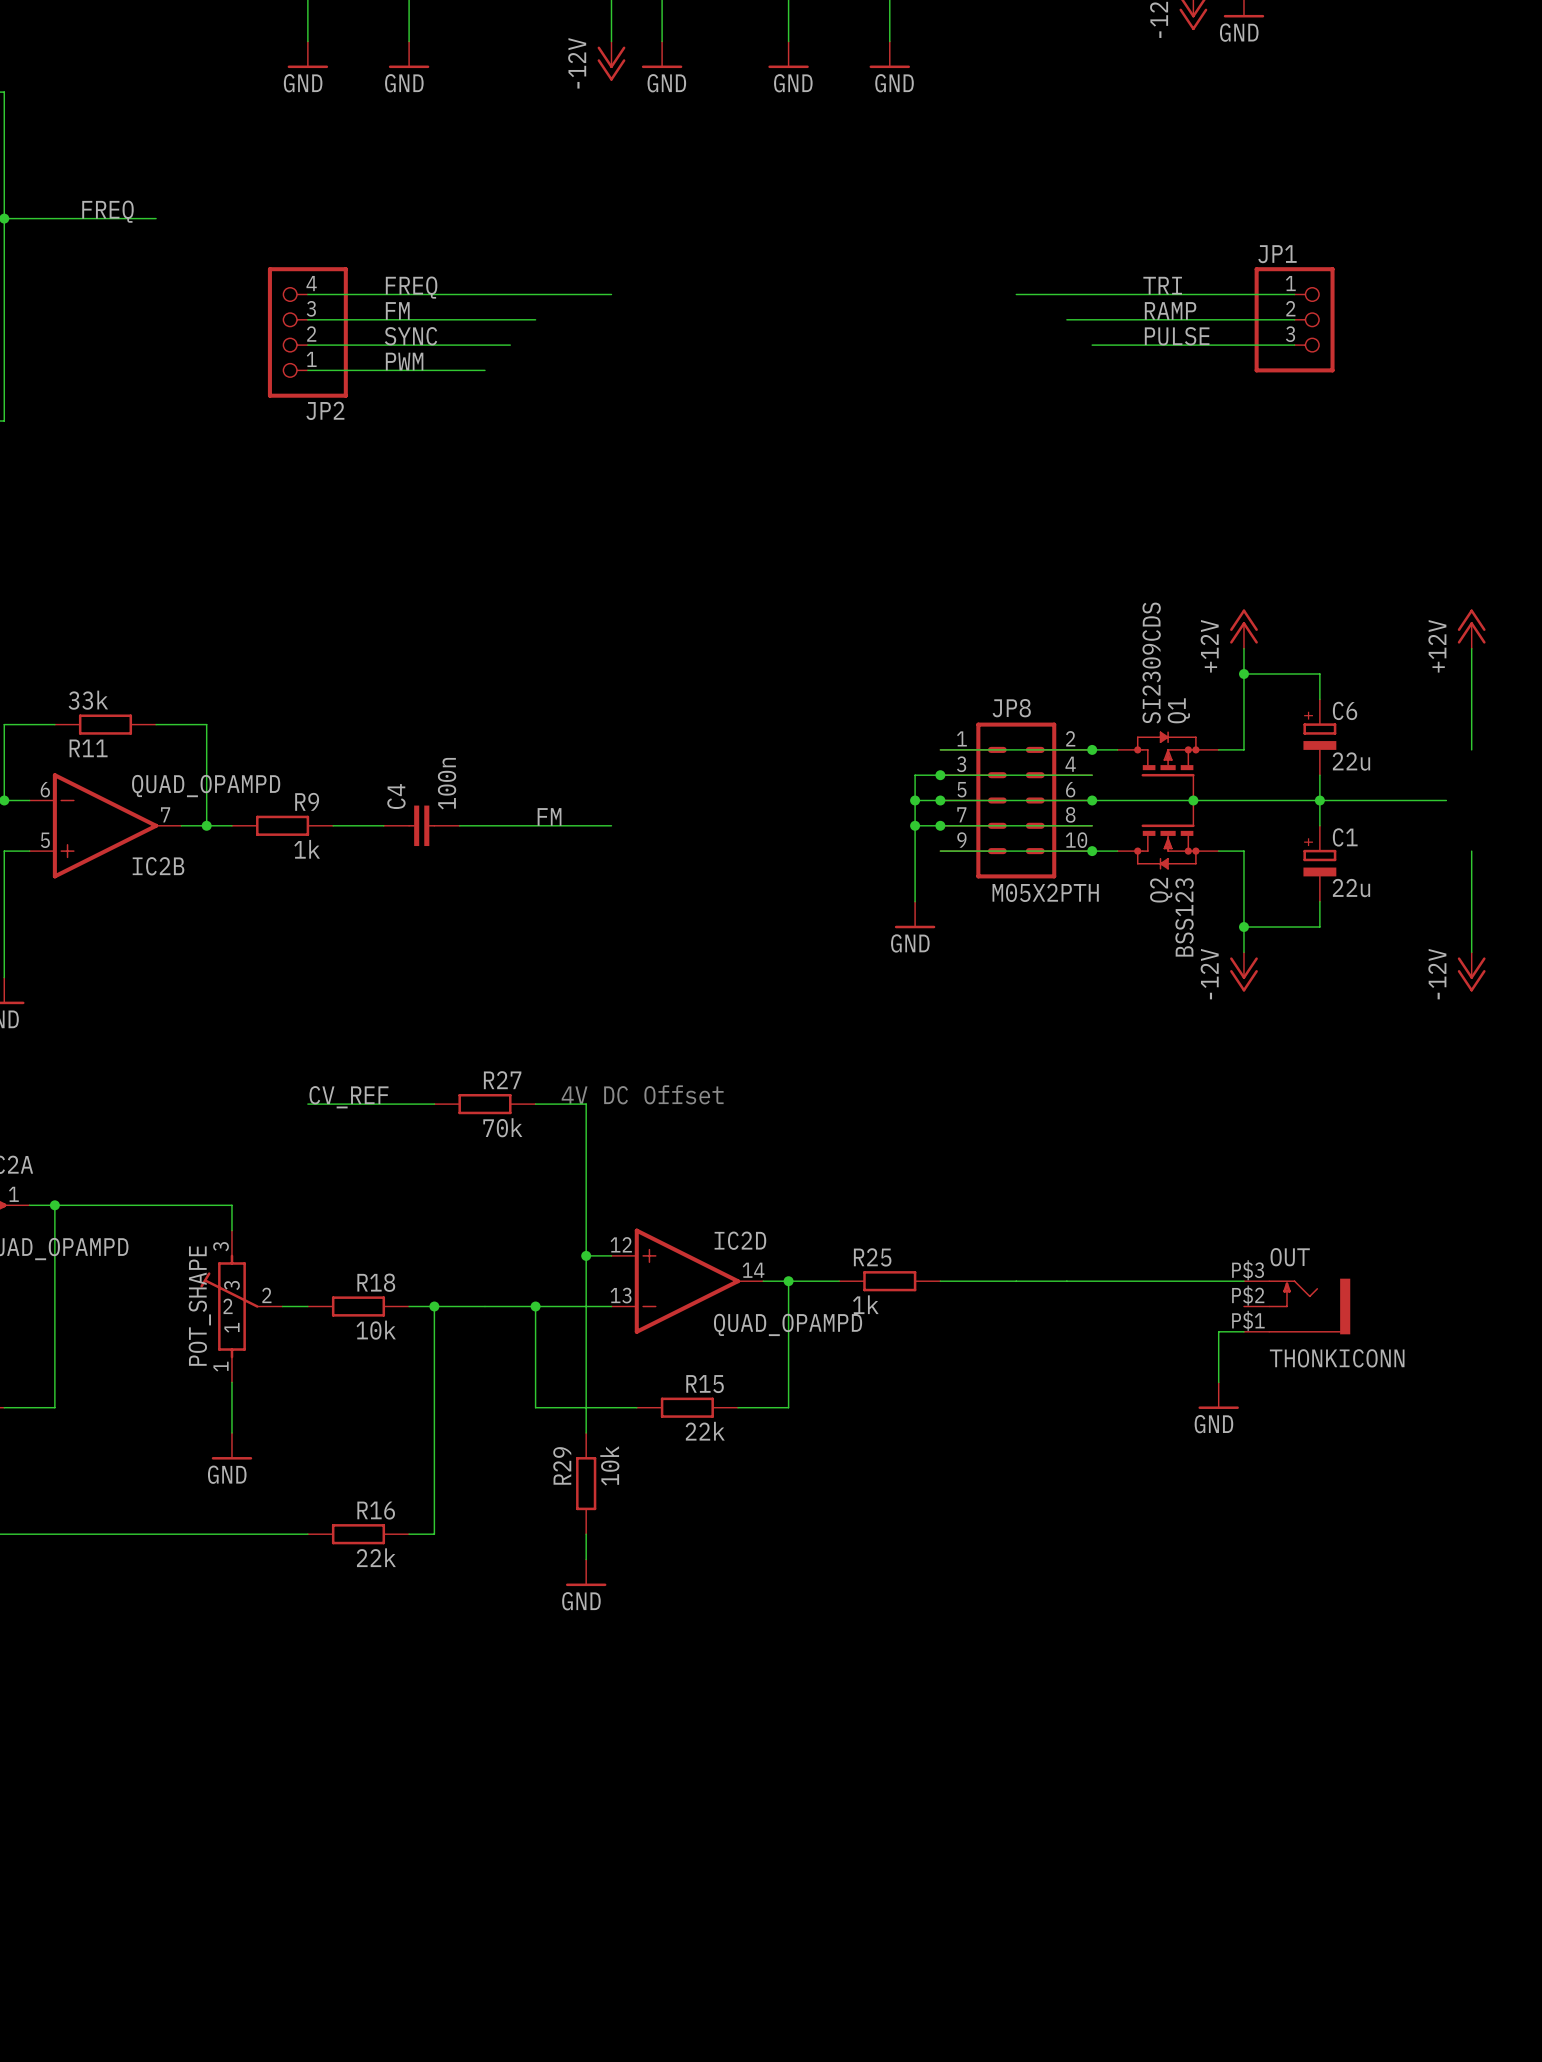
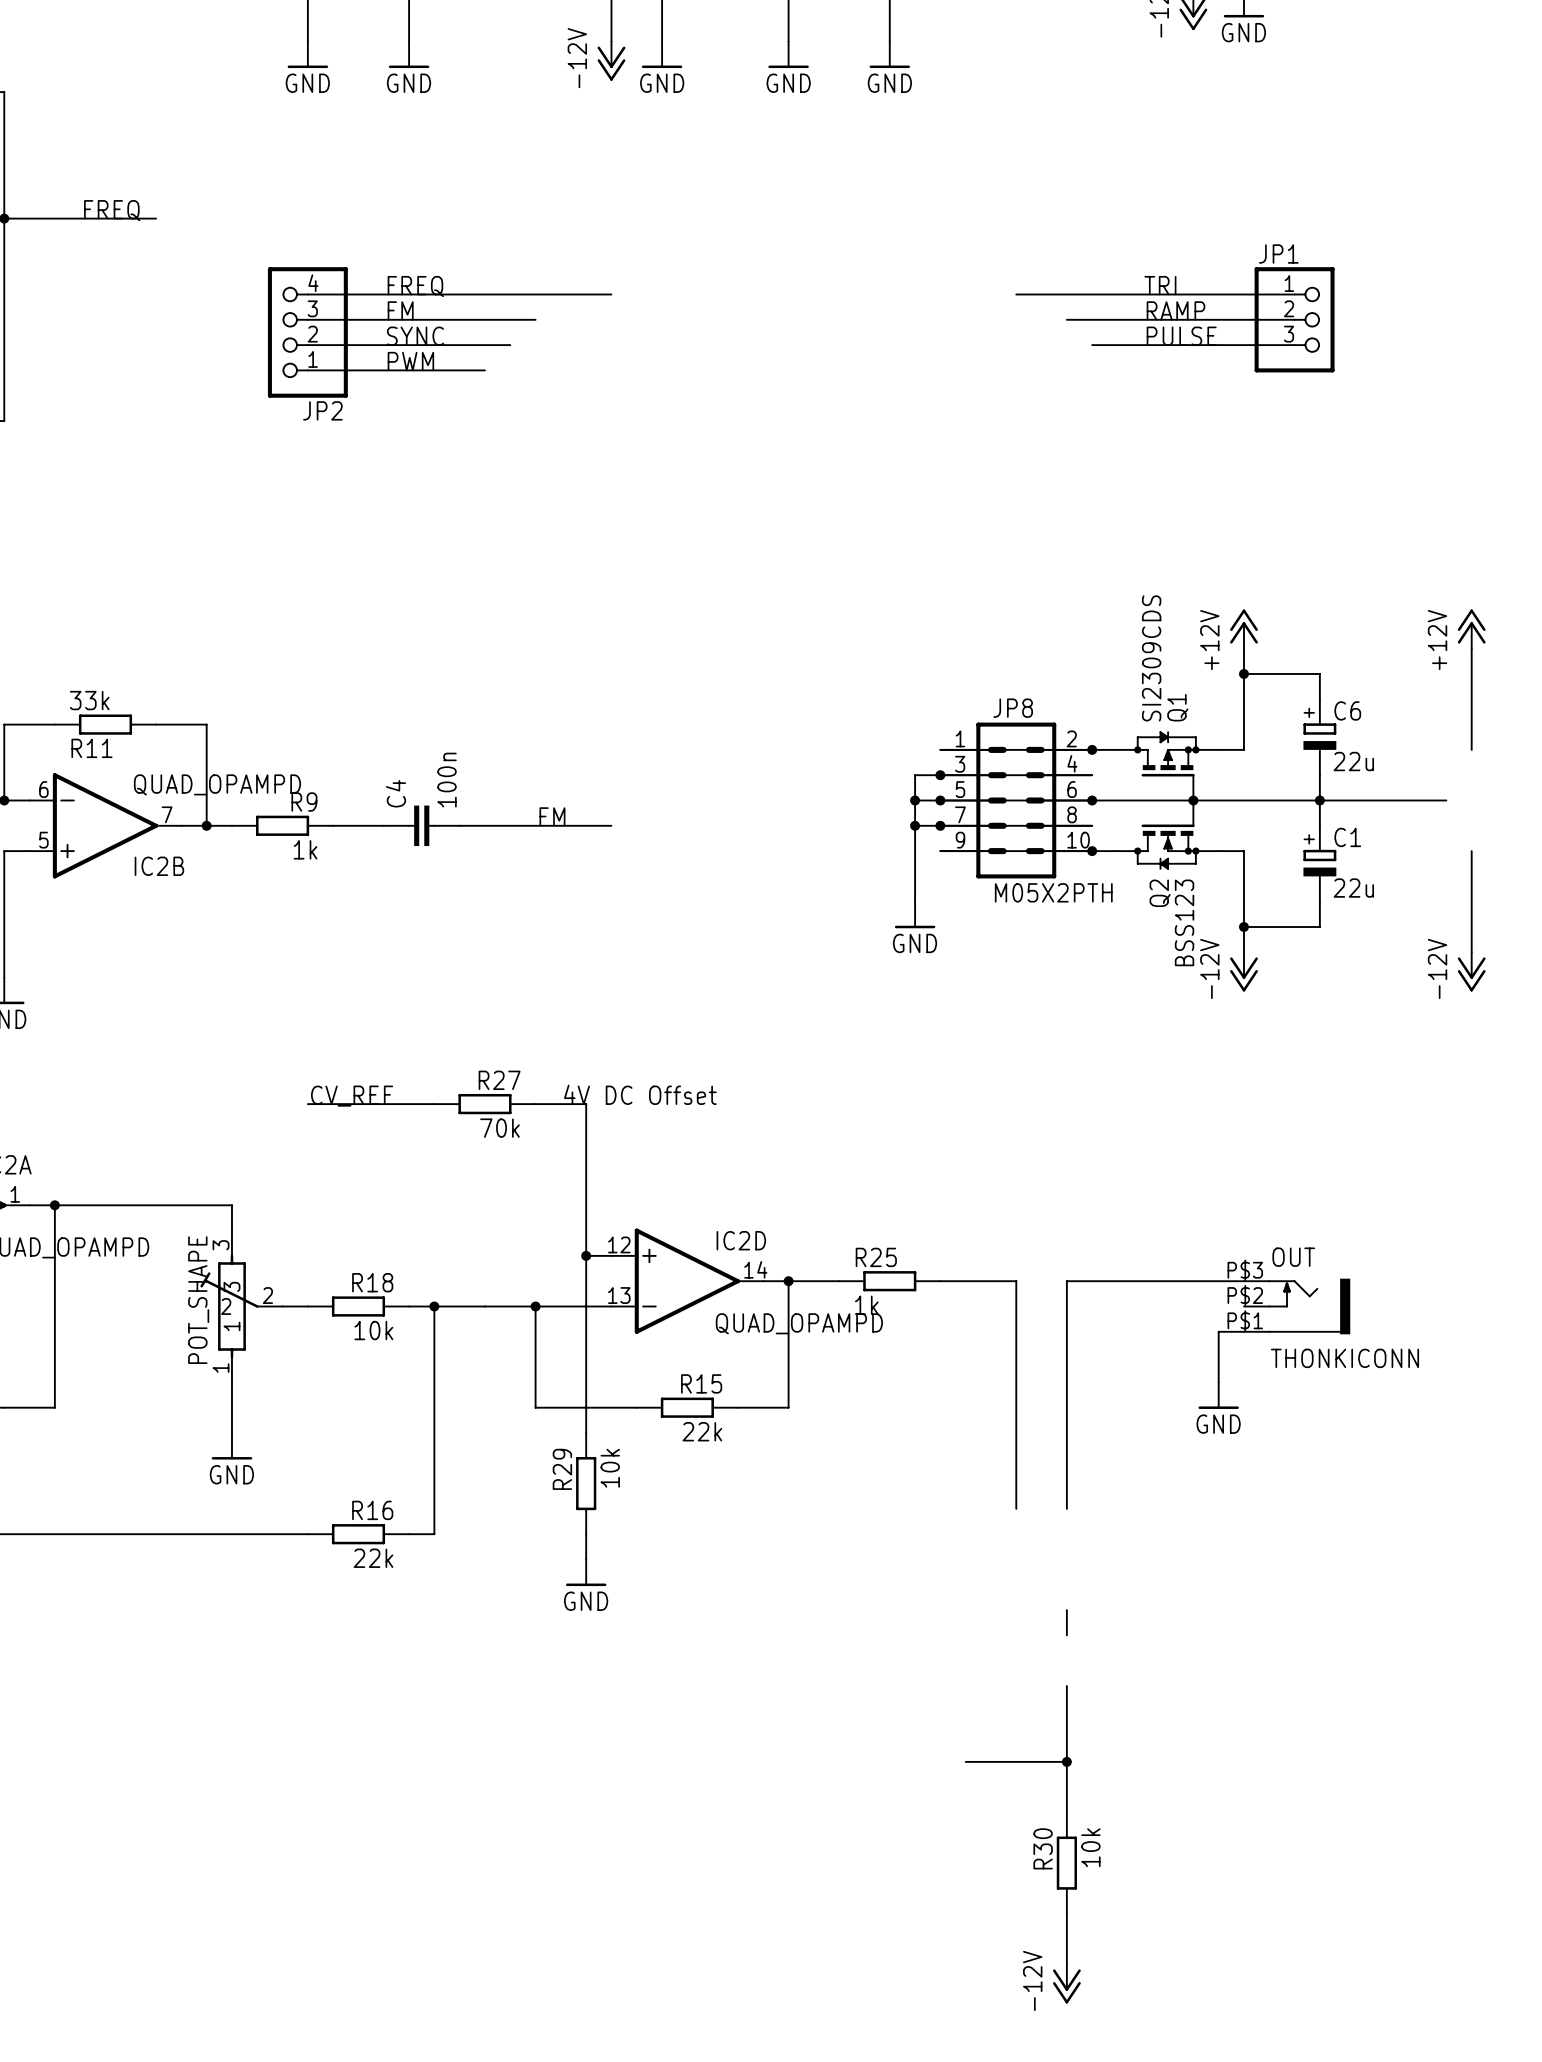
wire: (1016, 1281) (1066, 1281) -> (1016, 1281) (1016, 1508)
wire: none -> (1066, 1281) (1066, 1508)
wire: none -> (1066, 1610) (1066, 1635)
wire: none -> (1066, 1686) (1066, 1812)
wire: none -> (965, 1761) (1066, 1761)
junction: none -> (1066, 1761)
R30: none -> 10k (1066, 1863)
wire: none -> (1066, 1913) (1066, 1964)
power symbol: none -> -12V (1066, 1983)

